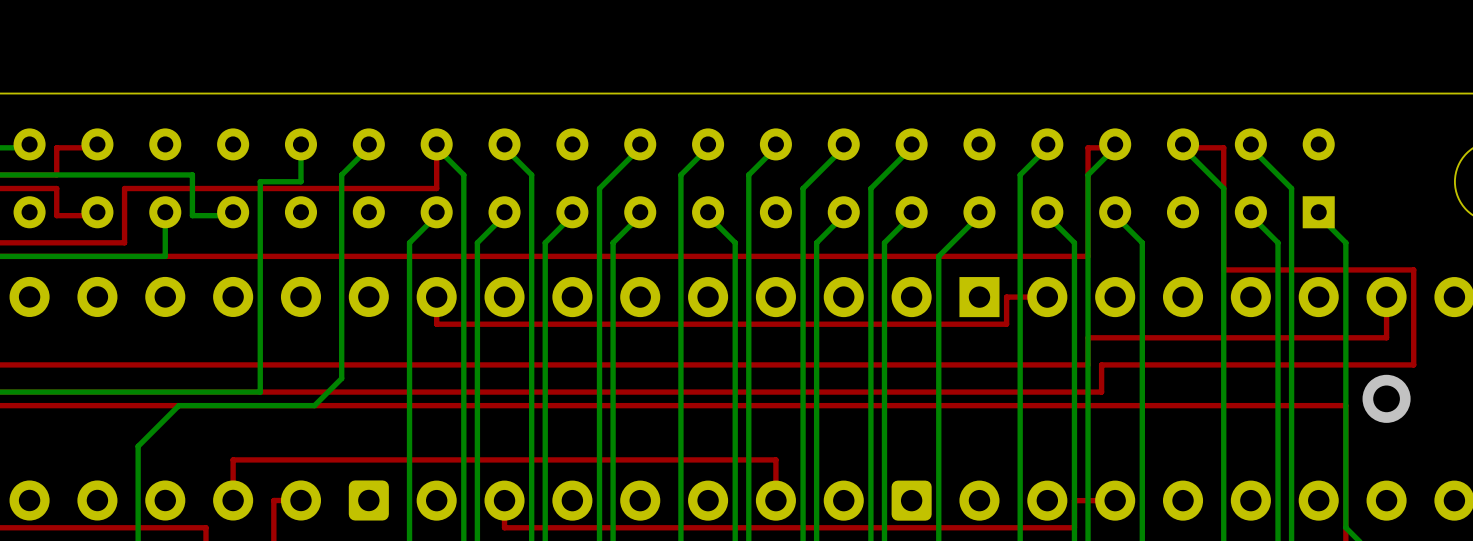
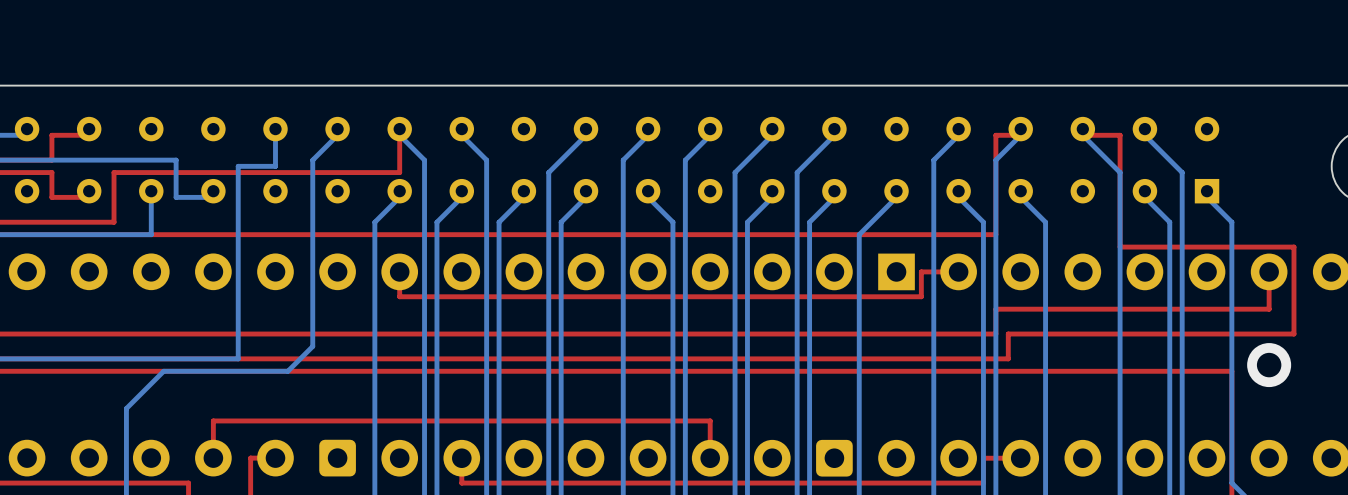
part footprint: [13, 128, 1335, 229] -> [14, 116, 1220, 204]

